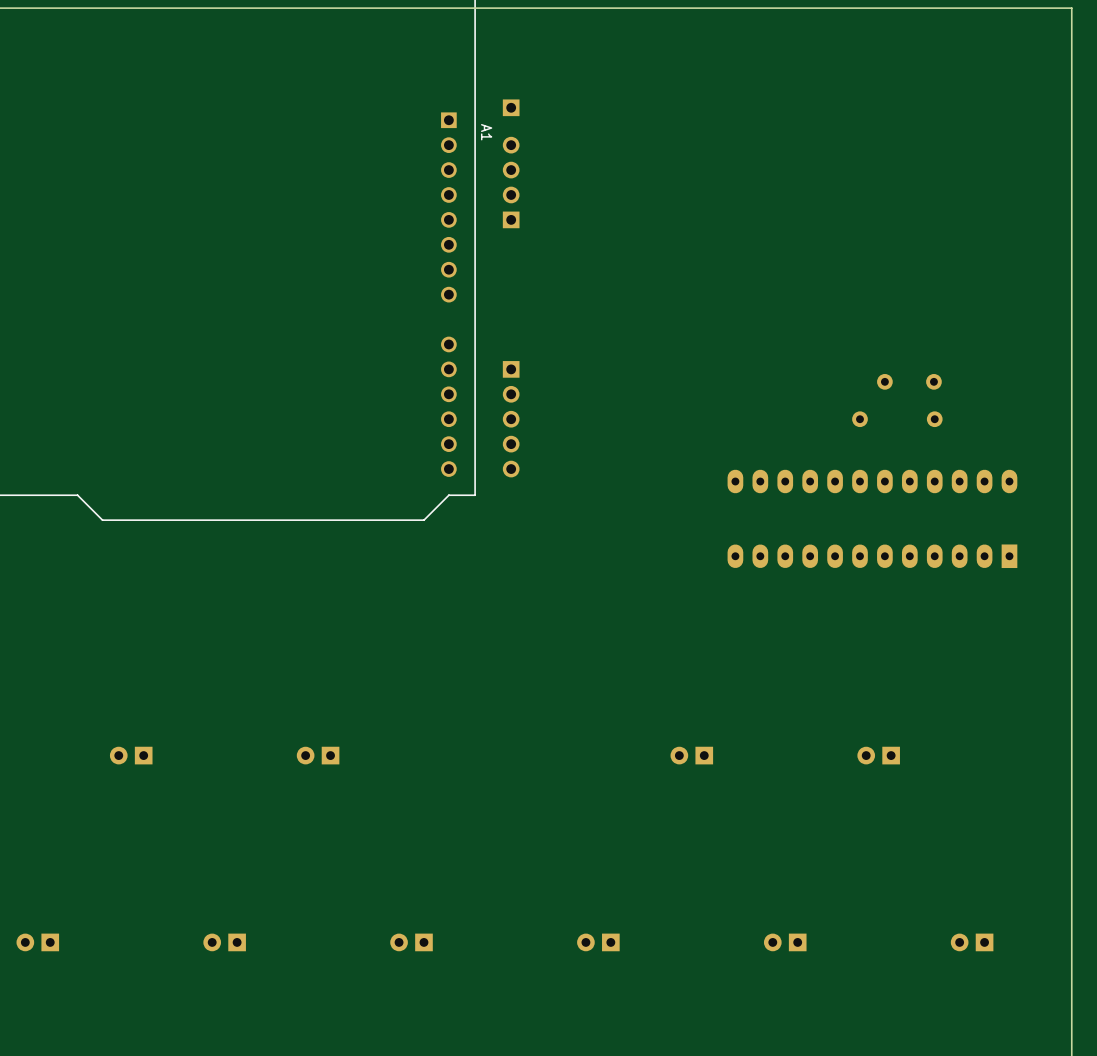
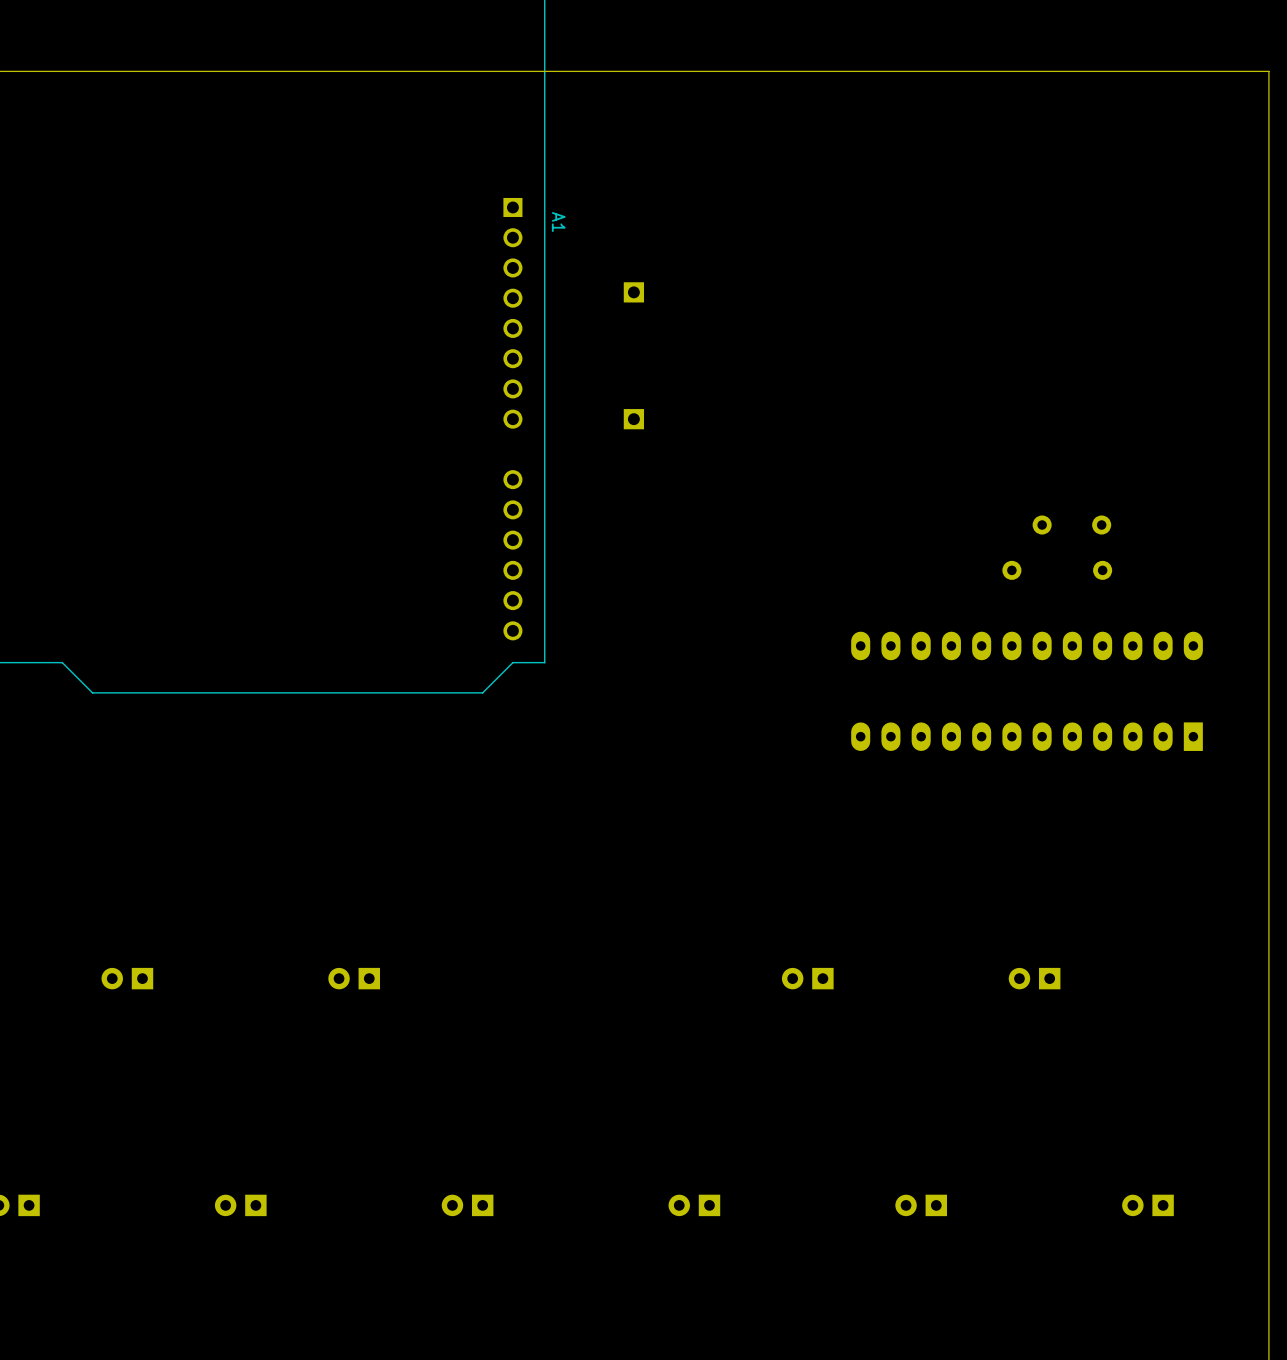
part position: (511, 107) -> (633, 292)
part: (511, 182) -> none
part: none -> (633, 419)
part: (511, 419) -> none

